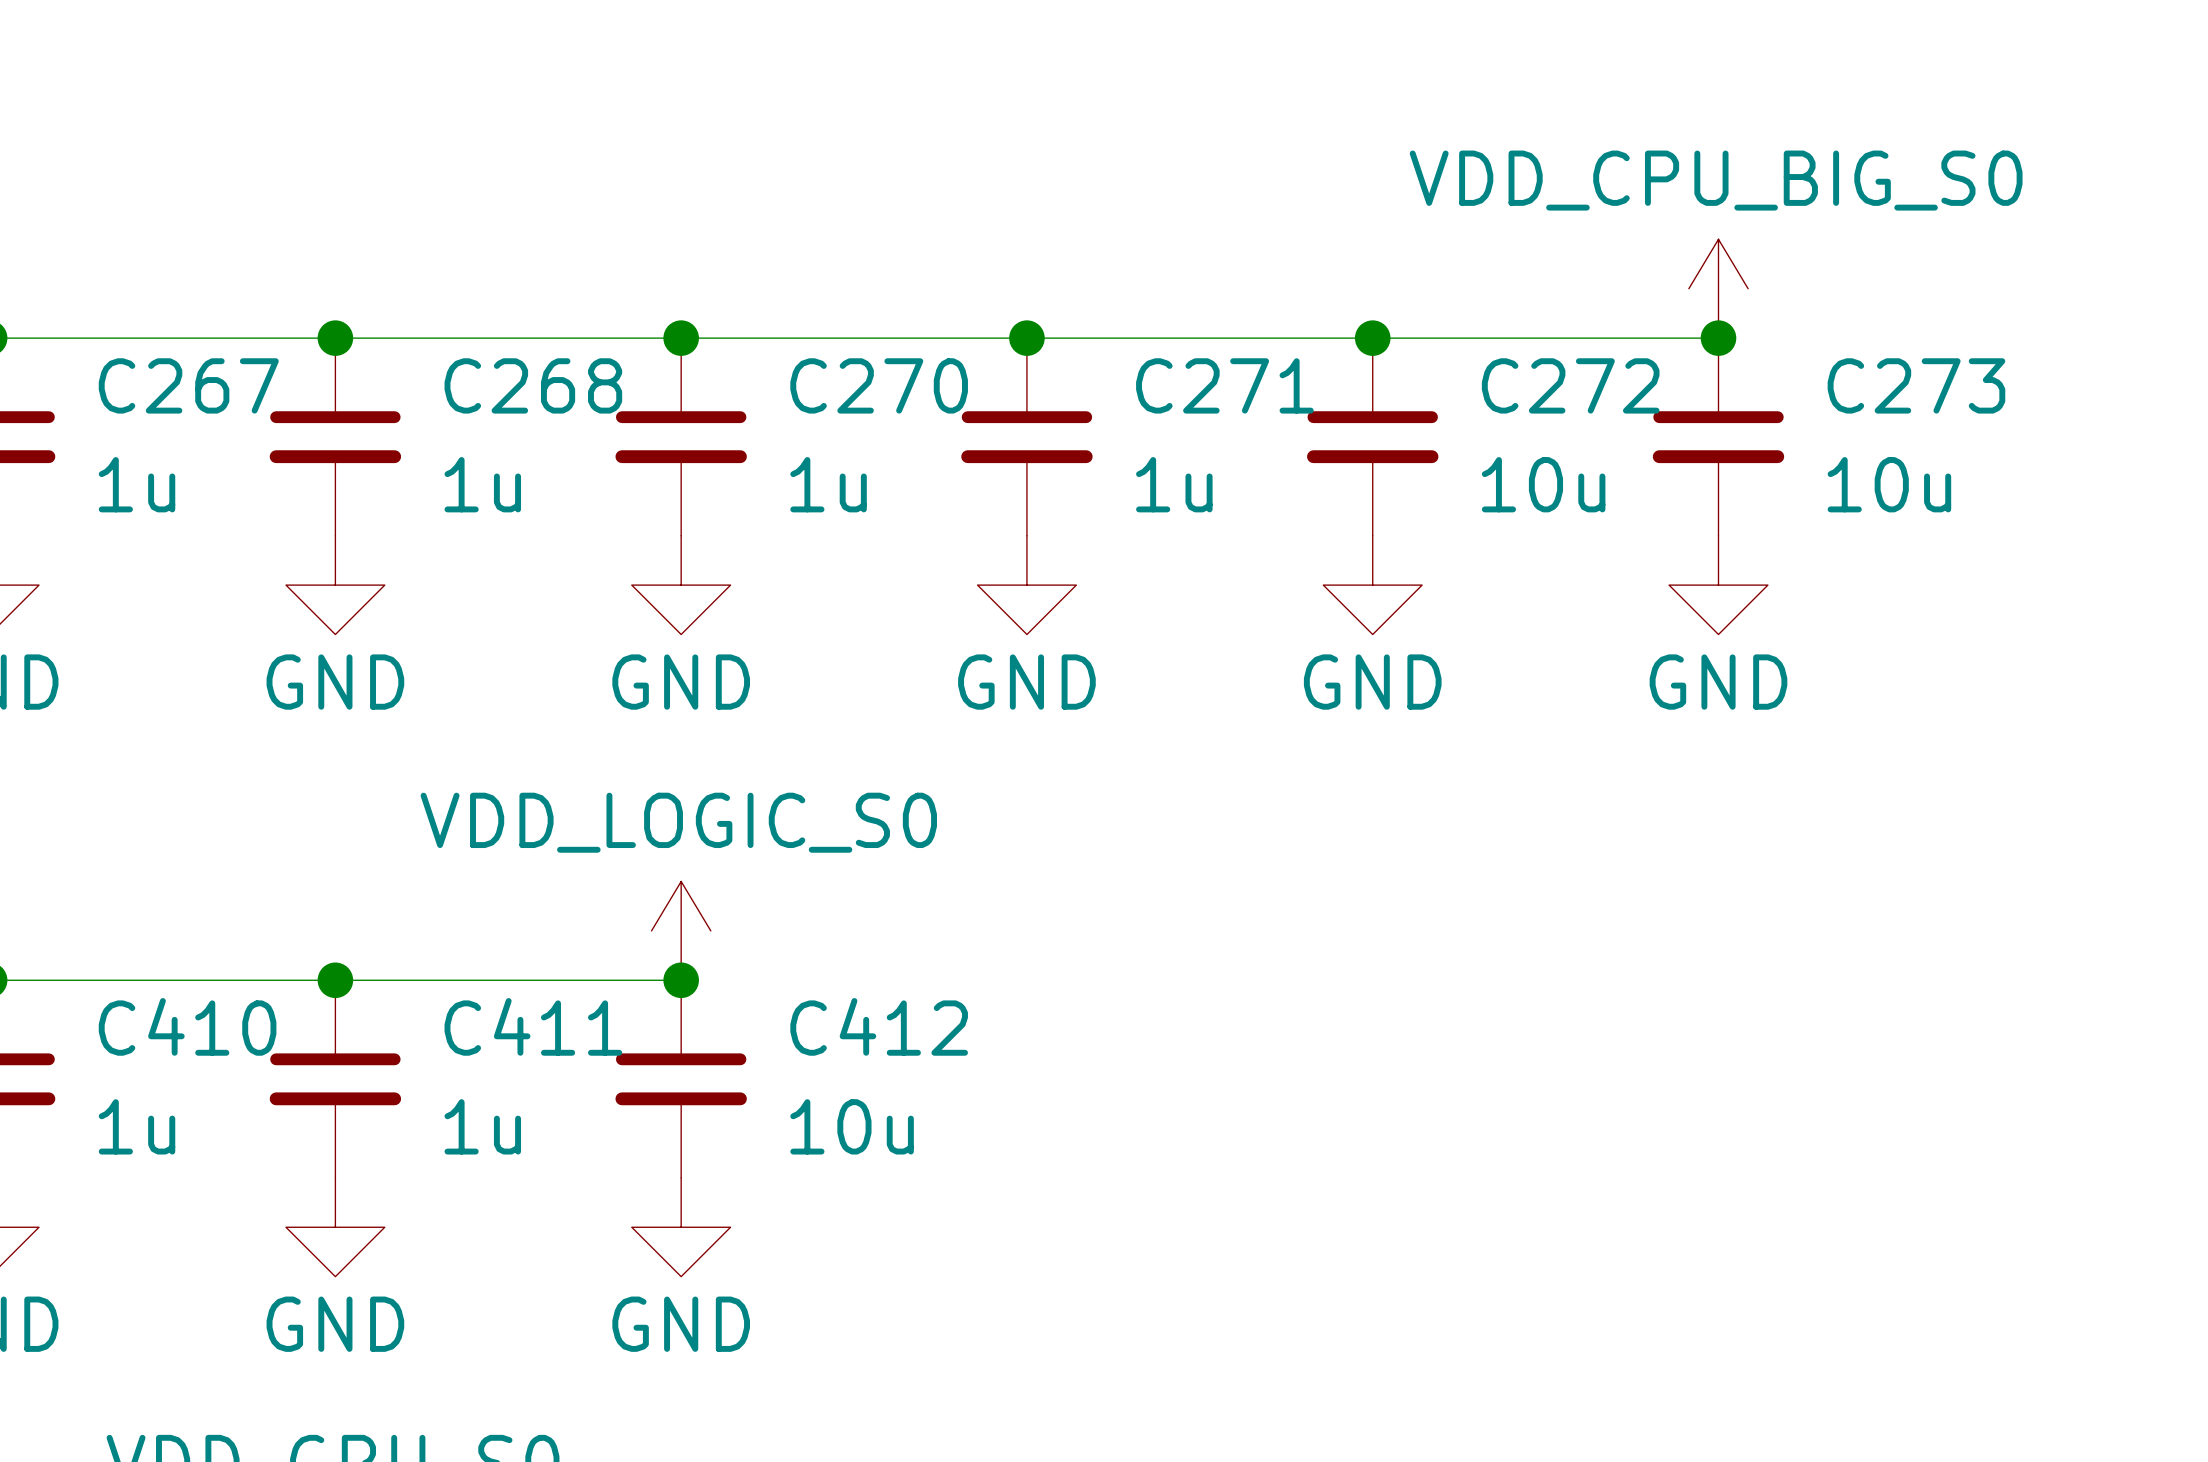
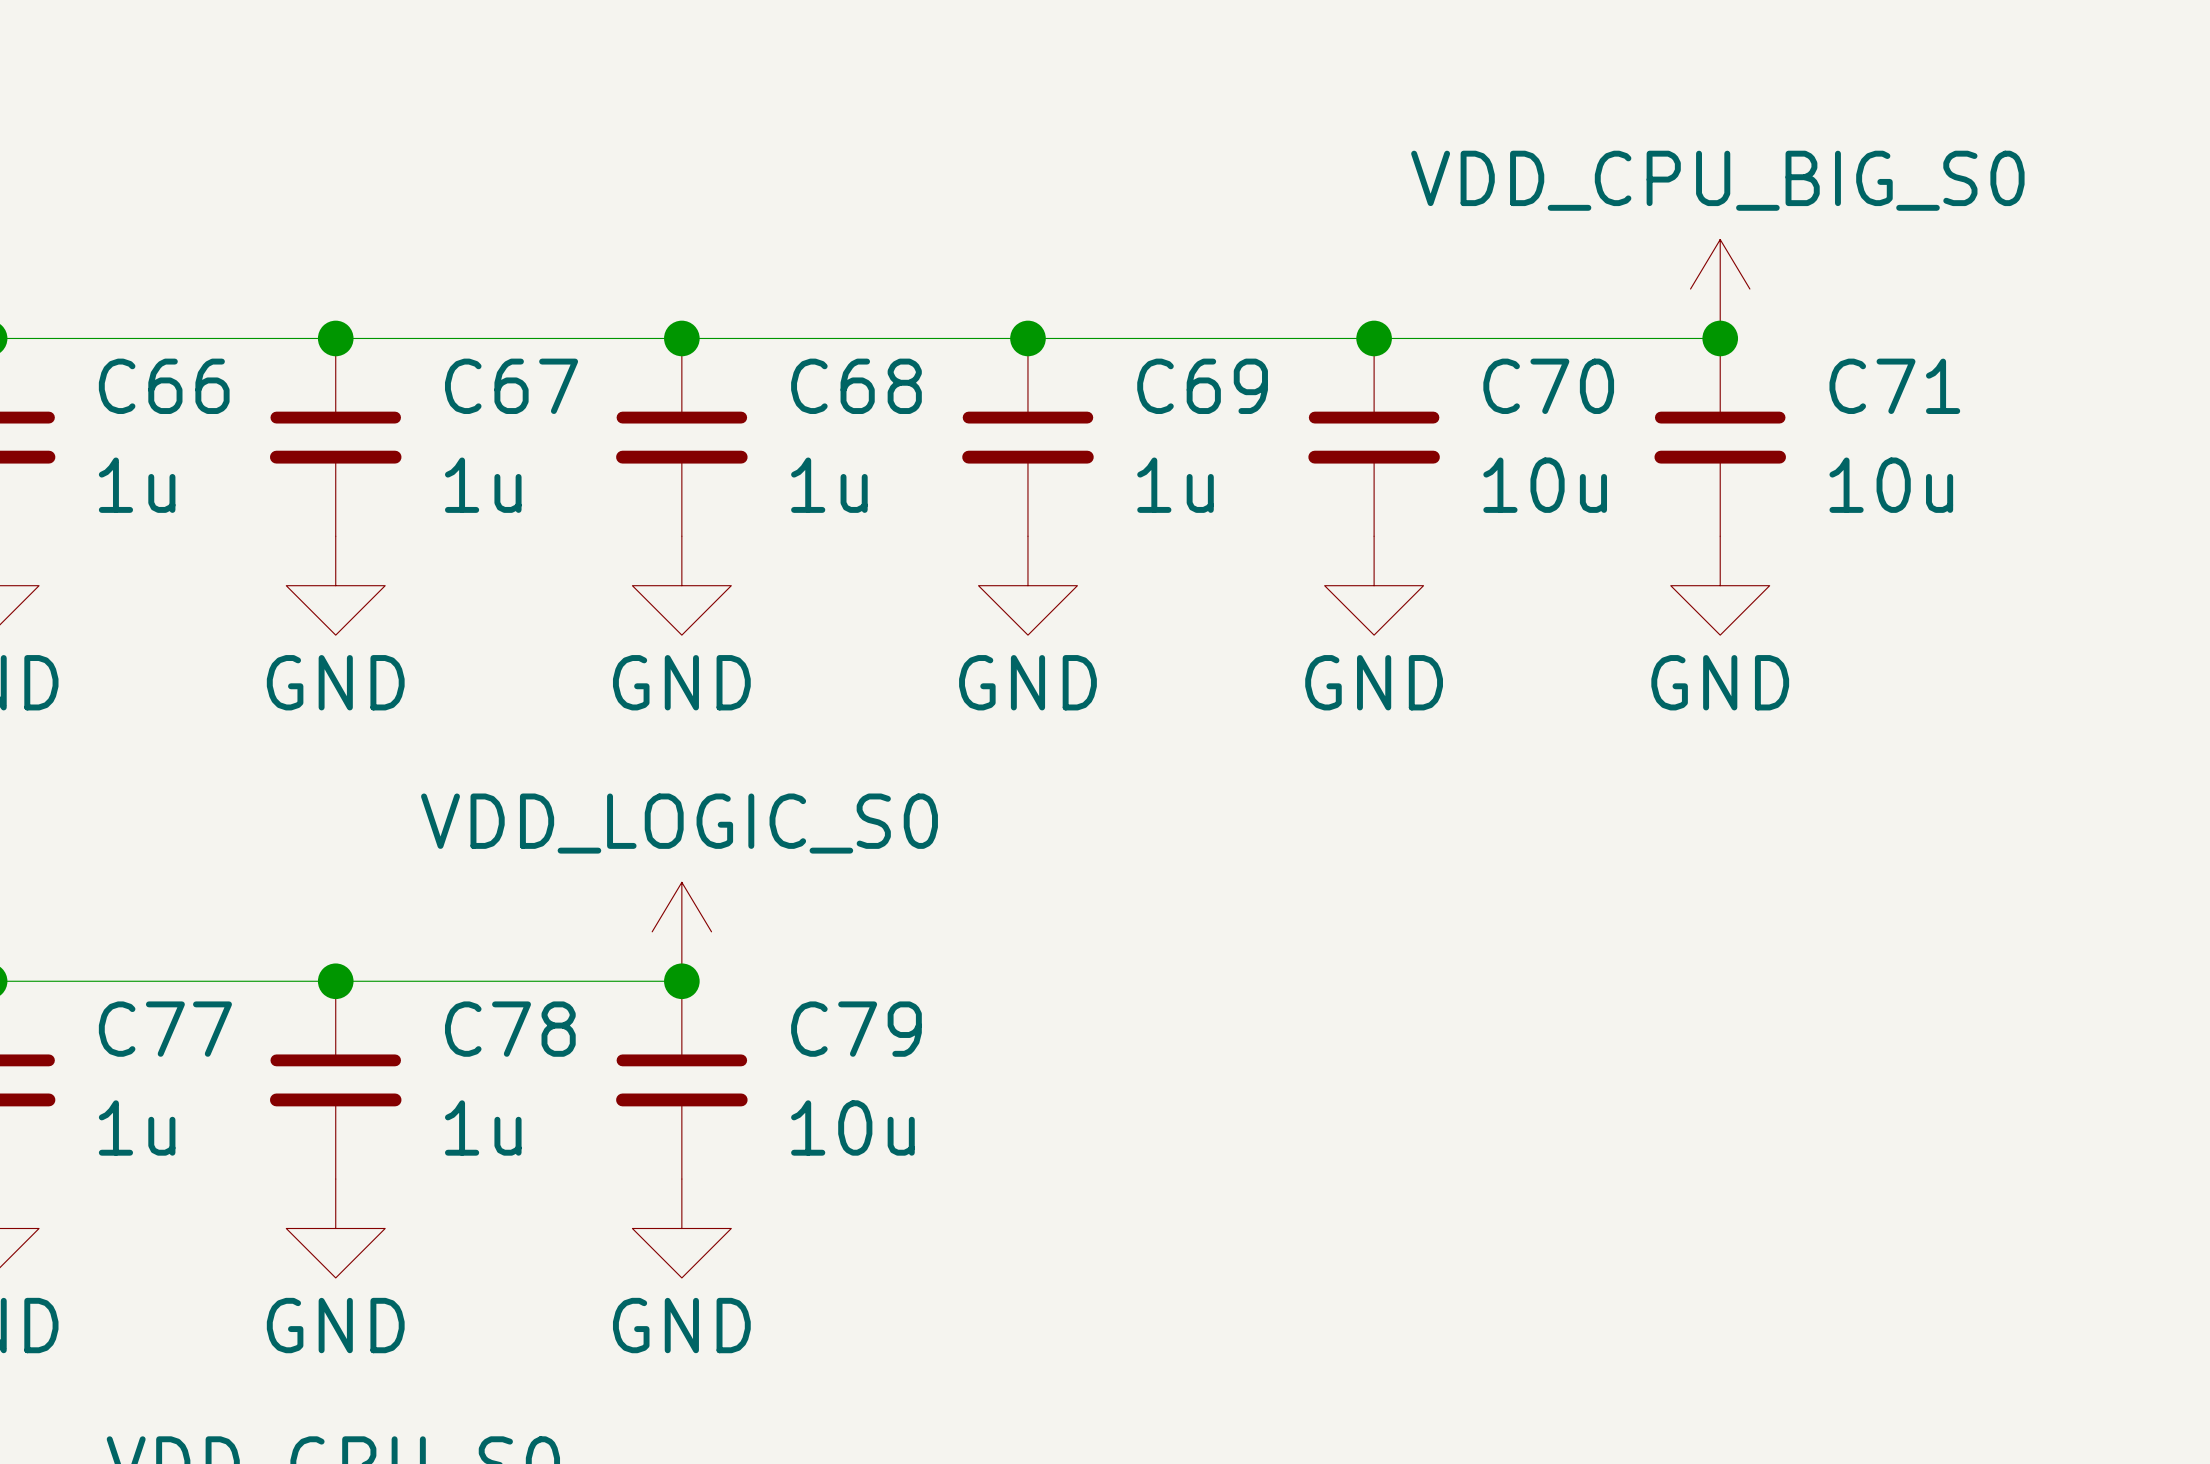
C267 name: C267 (188, 385) -> C66 (164, 386)
C268 name: C268 (533, 385) -> C67 (511, 386)
C270 name: C270 (879, 385) -> C68 (856, 386)
C271 name: C271 (1224, 385) -> C69 (1202, 386)
C272 name: C272 (1570, 385) -> C70 (1548, 386)
C273 name: C273 (1916, 385) -> C71 (1894, 386)
C410 name: C410 (187, 1026) -> C77 (165, 1029)
C411 name: C411 (533, 1026) -> C78 (510, 1029)
C412 name: C412 (879, 1026) -> C79 (856, 1029)

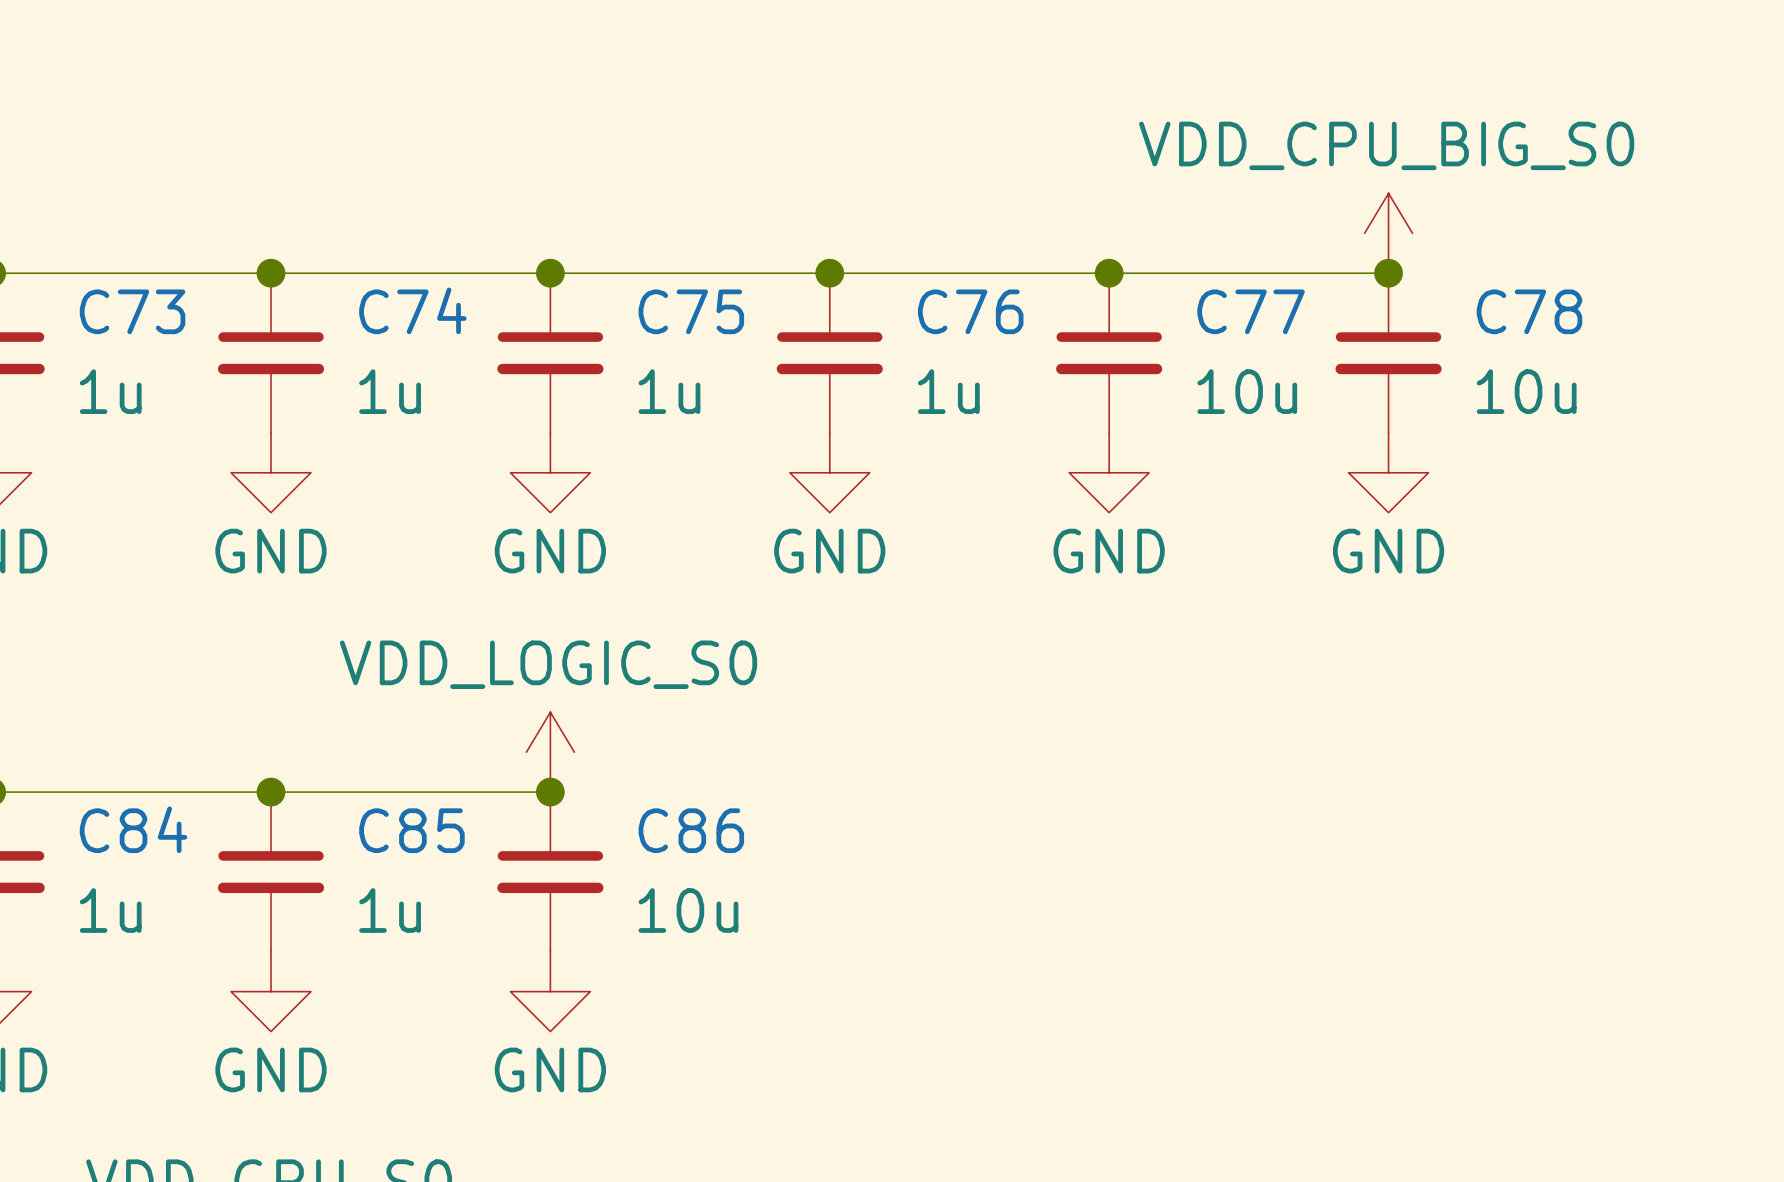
C66 name: C66 (164, 386) -> C73 (132, 311)
C67 name: C67 (511, 386) -> C74 (412, 310)
C68 name: C68 (856, 386) -> C75 (691, 311)
C69 name: C69 (1202, 386) -> C76 (970, 311)
C70 name: C70 (1548, 386) -> C77 (1251, 311)
C71 name: C71 (1894, 386) -> C78 (1529, 311)
C77 name: C77 (165, 1029) -> C84 (133, 829)
C78 name: C78 (510, 1029) -> C85 (411, 830)
C79 name: C79 (856, 1029) -> C86 (691, 830)

